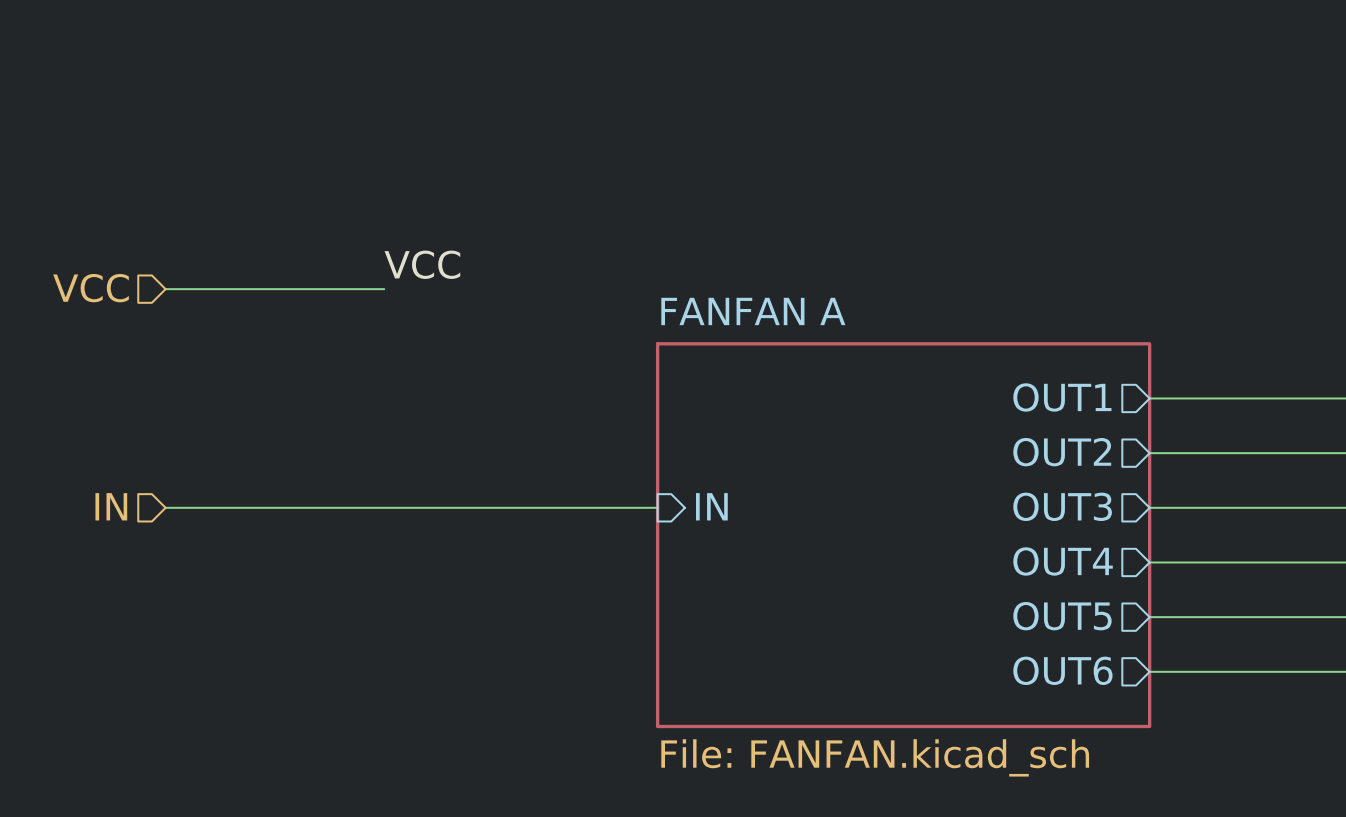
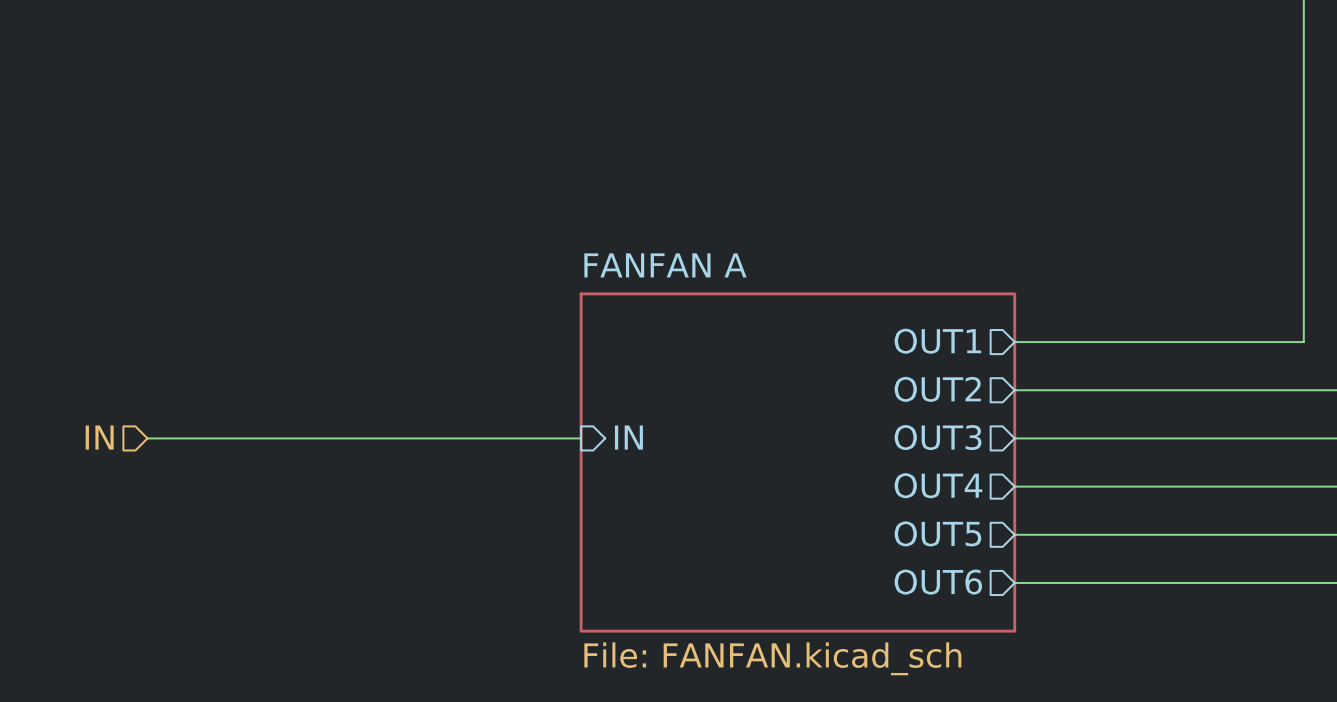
label: VCC (422, 264) -> none
hierarchical label: VCC (91, 288) -> none
wire: (165, 289) (384, 289) -> none

